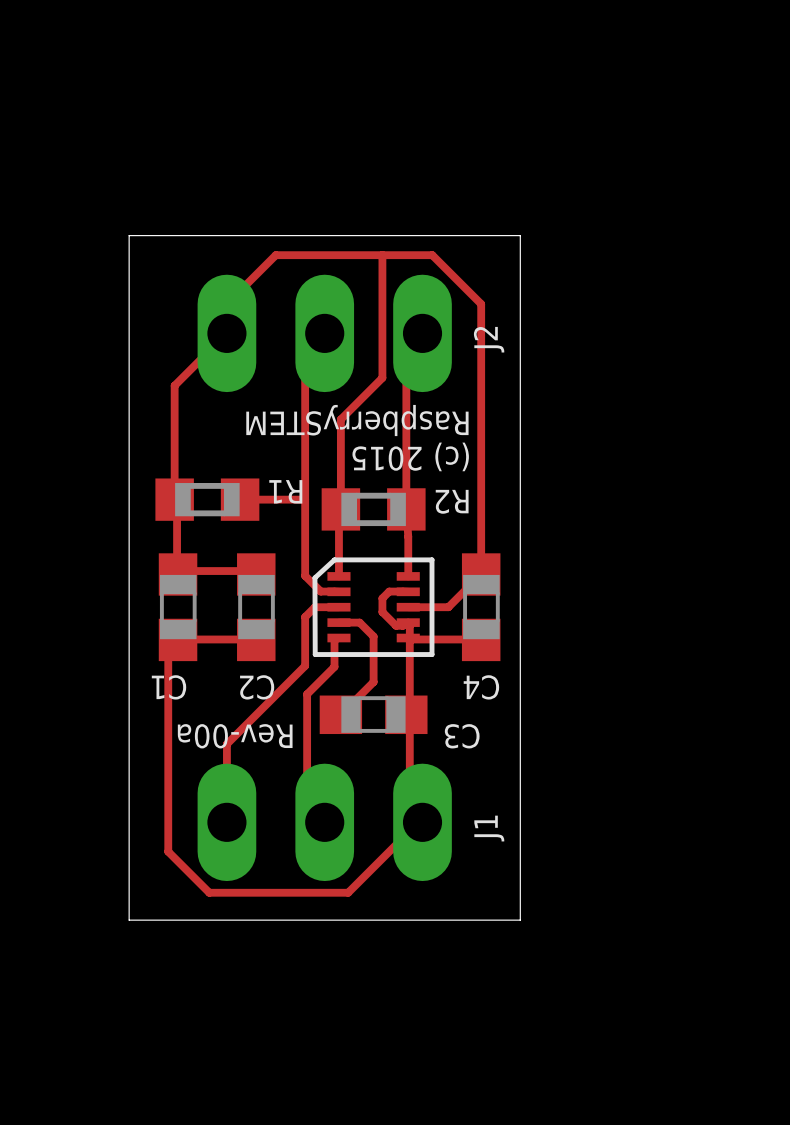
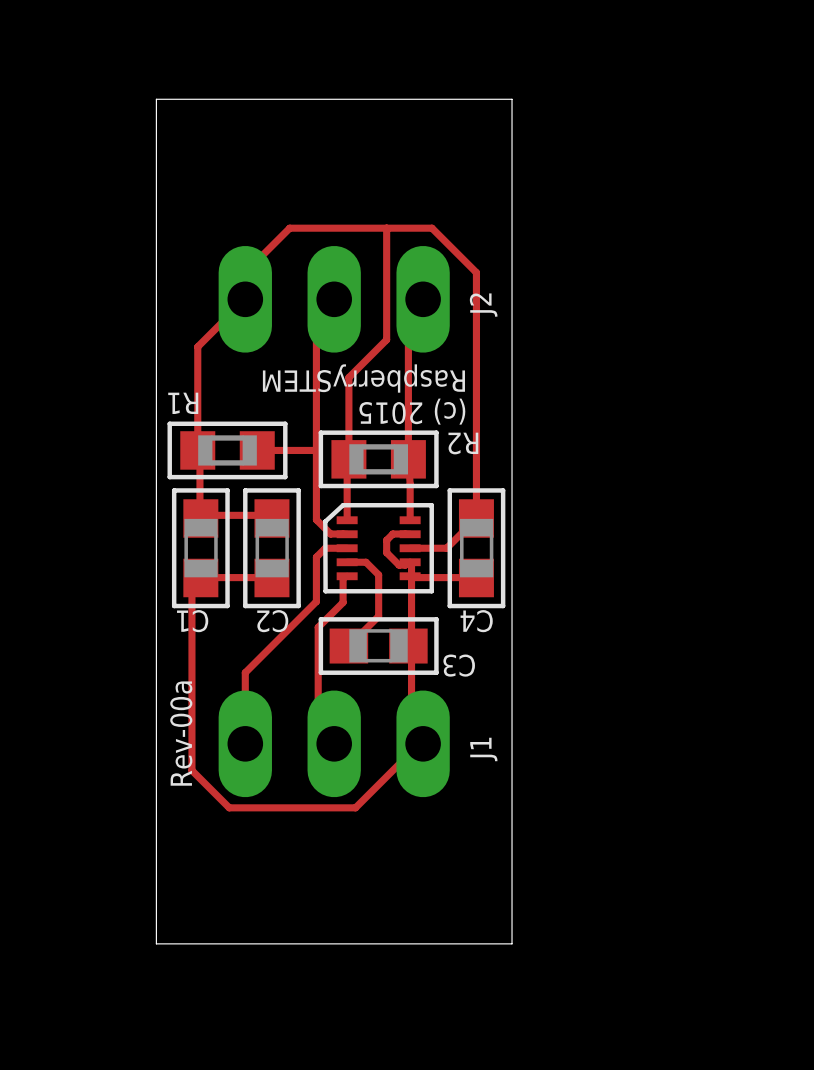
board edge: (129, 235) (520, 235) -> (156, 210) (156, 99) (512, 99) (512, 210)
R1 footprint: [155, 478, 260, 521] -> [167, 421, 288, 480]
R2 footprint: [321, 488, 426, 531] -> [318, 430, 439, 489]
R1 name position: R1 (285, 491) -> R1 (183, 403)
C1 footprint: [158, 553, 198, 662] -> [171, 488, 230, 609]
C2 footprint: [237, 553, 276, 662] -> [243, 488, 301, 609]
C4 footprint: [461, 553, 501, 662] -> [447, 488, 506, 609]
C3 footprint: [319, 695, 428, 735] -> [318, 617, 439, 675]
text rotation: 0° (235, 736) -> 90° clockwise (181, 733)
board edge: (129, 920) (520, 920) -> (156, 832) (156, 943) (512, 943) (512, 832)

